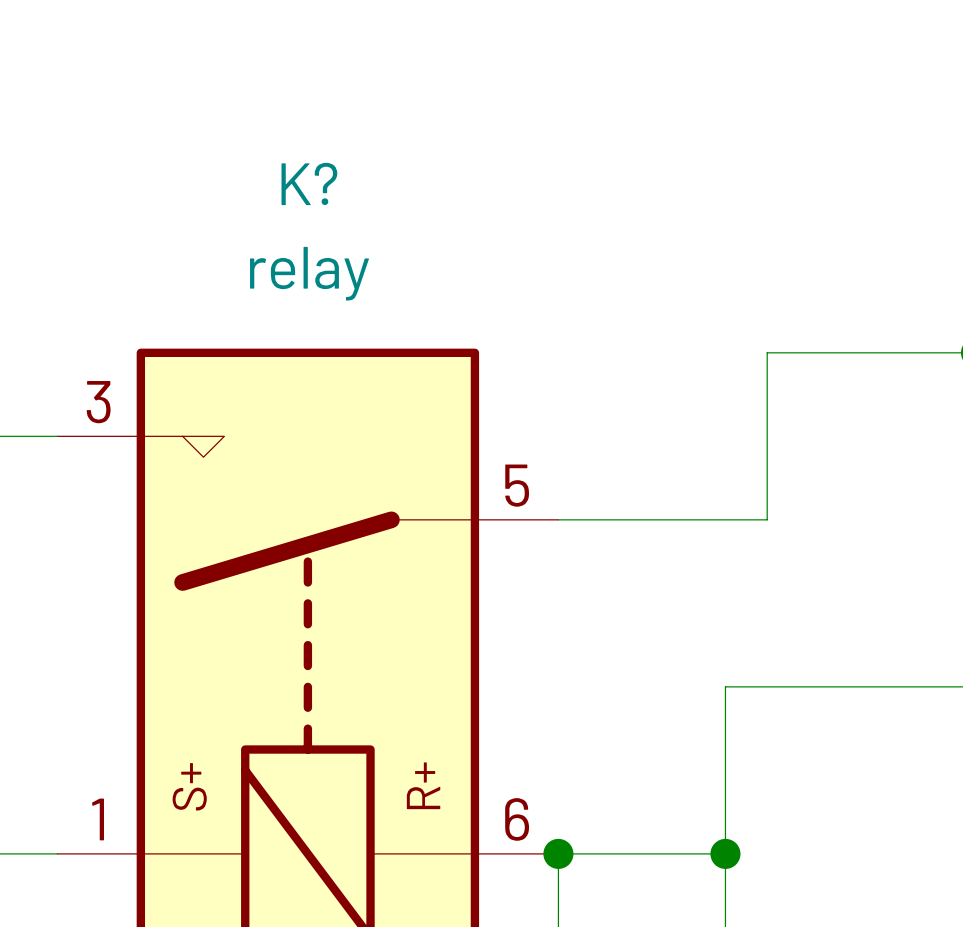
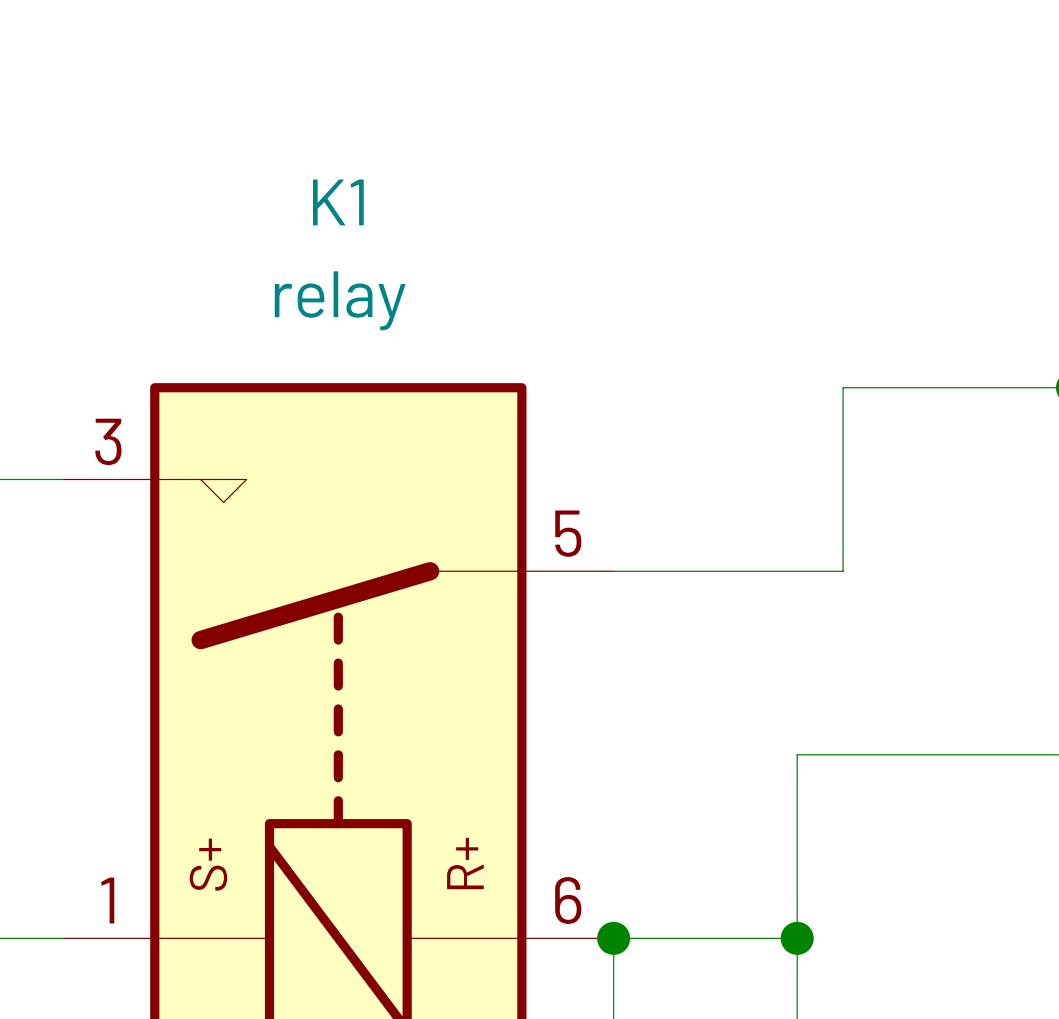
K? name: K? (309, 183) -> K1 (338, 202)

